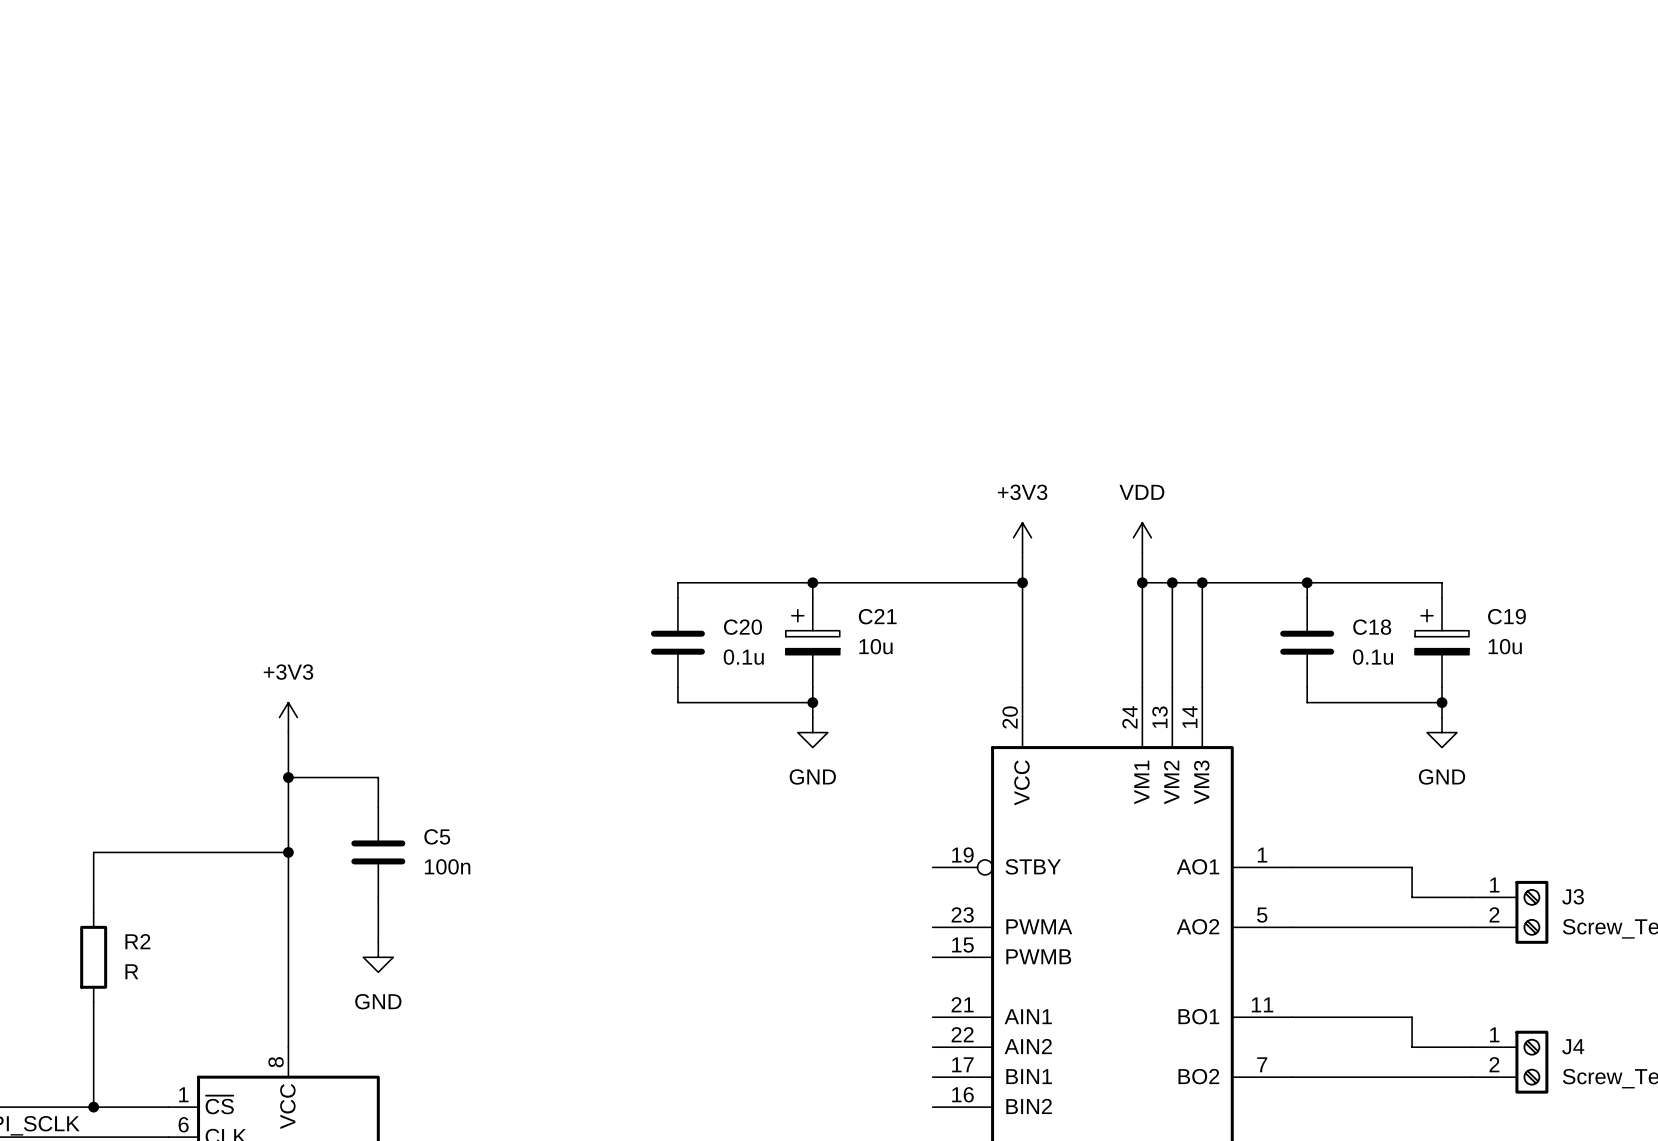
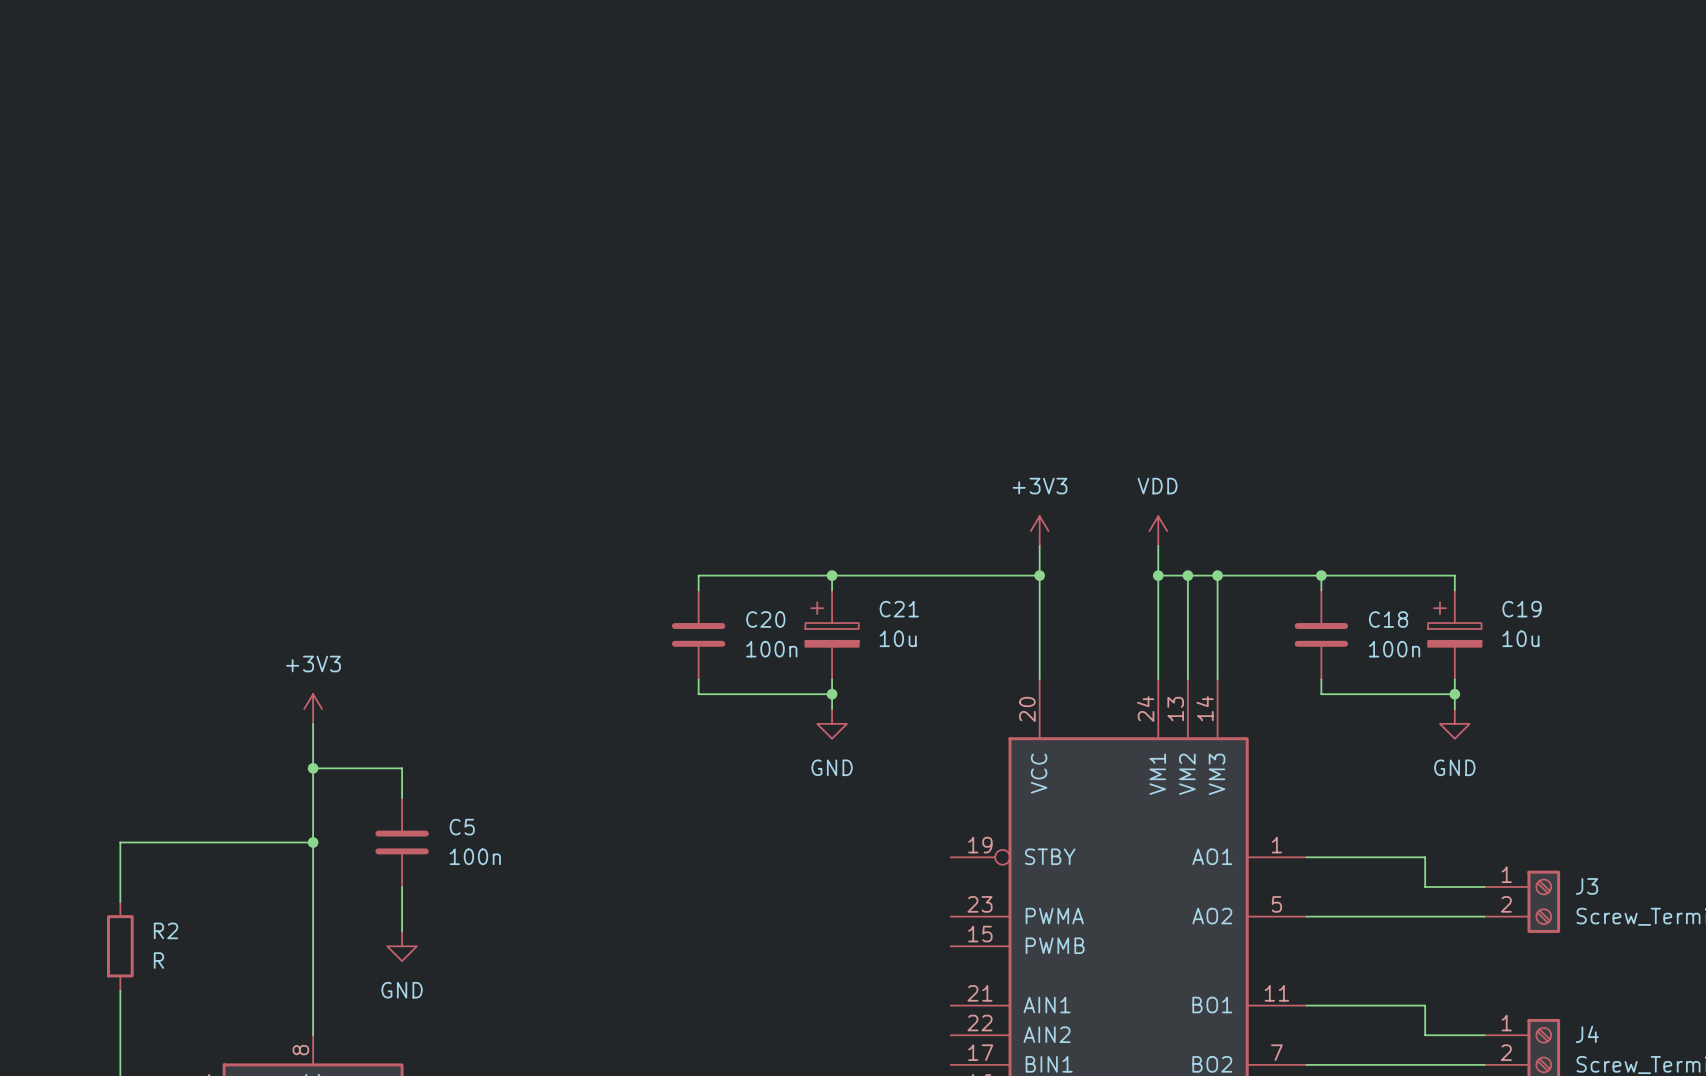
C20 value: 0.1u (743, 657) -> 100n (771, 649)
C18 value: 0.1u (1373, 657) -> 100n (1394, 649)

